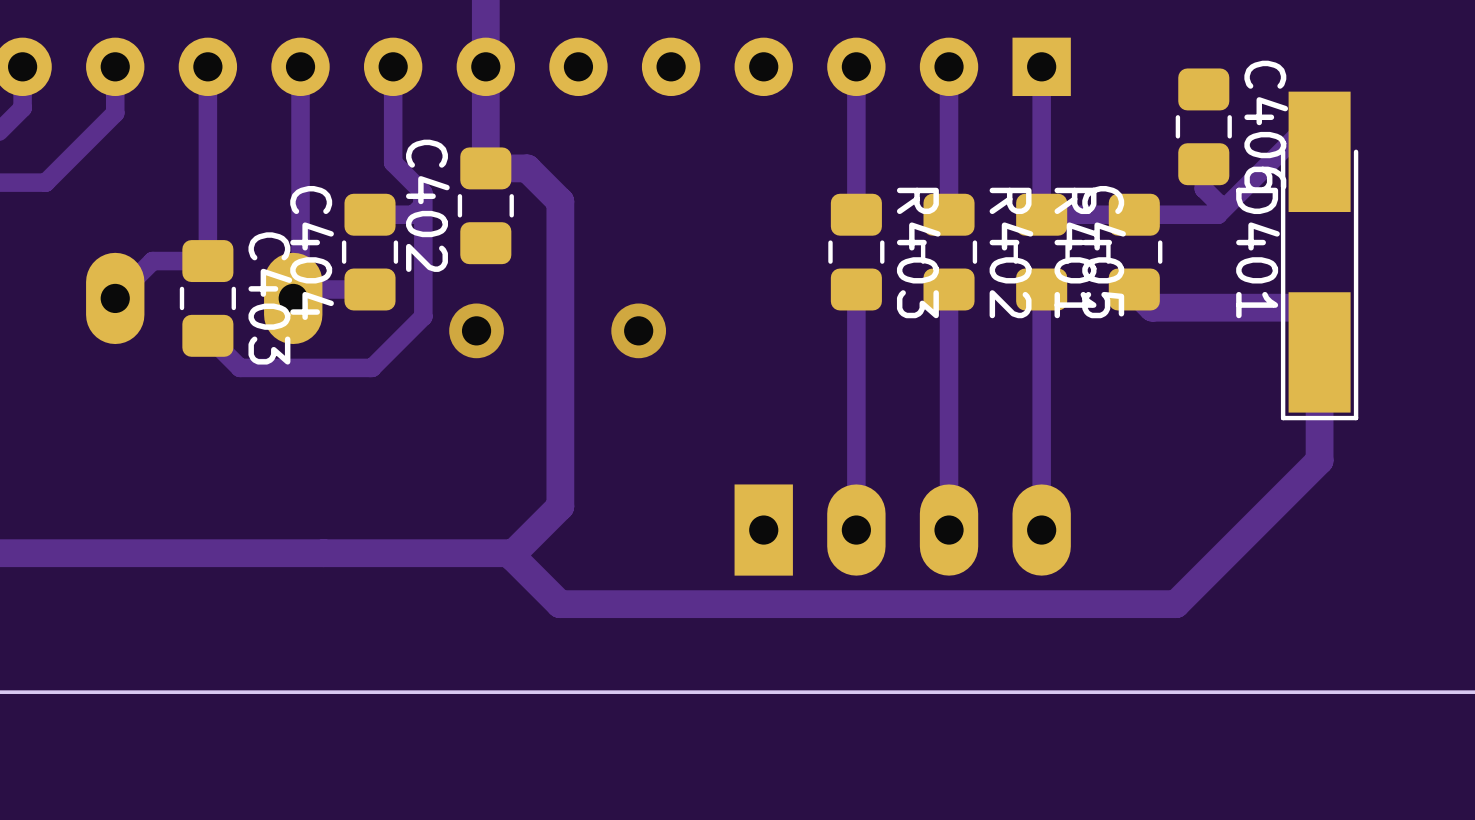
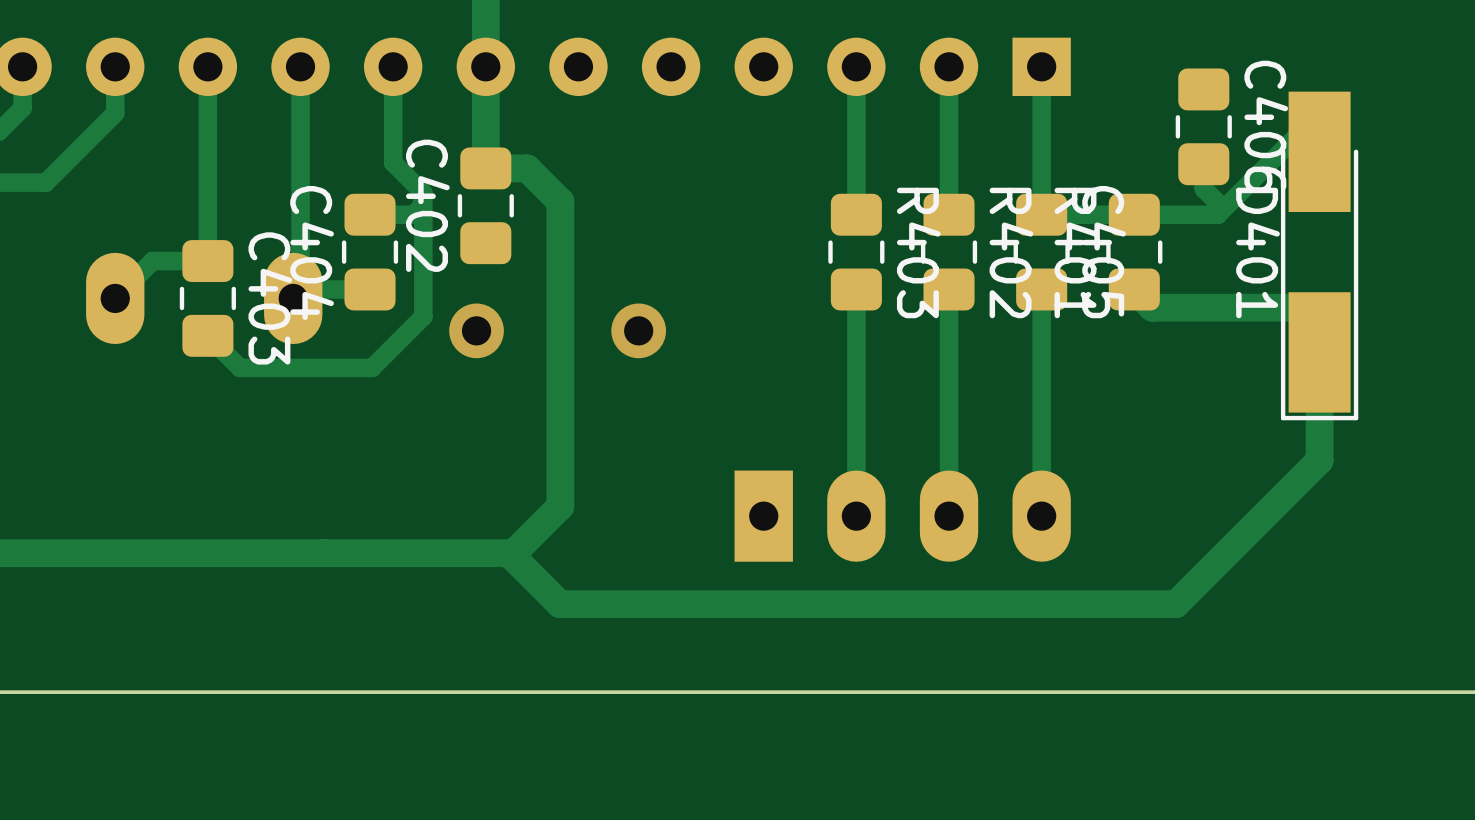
part position: (902, 530) -> (902, 516)

